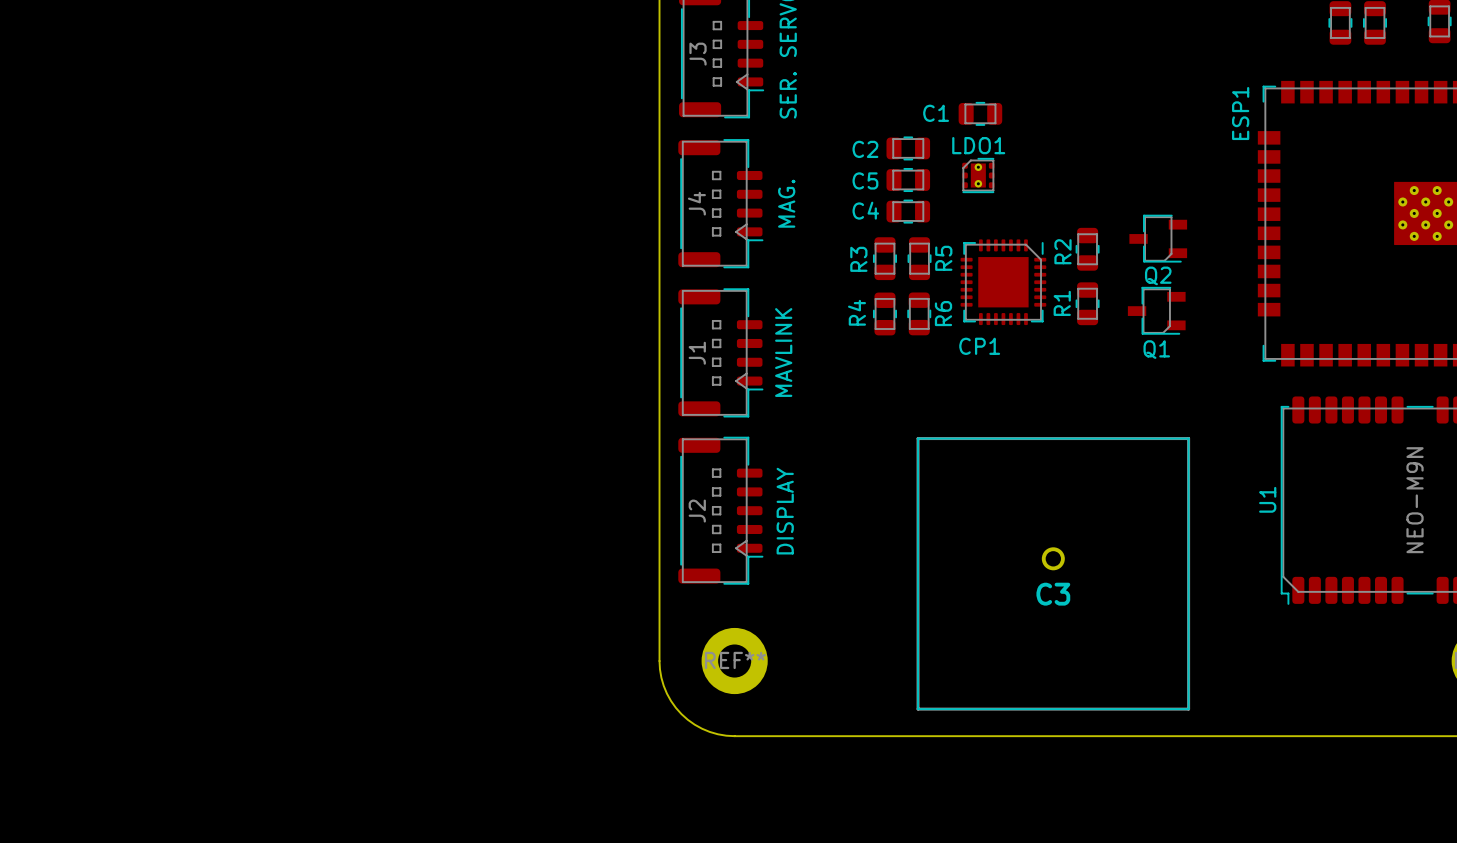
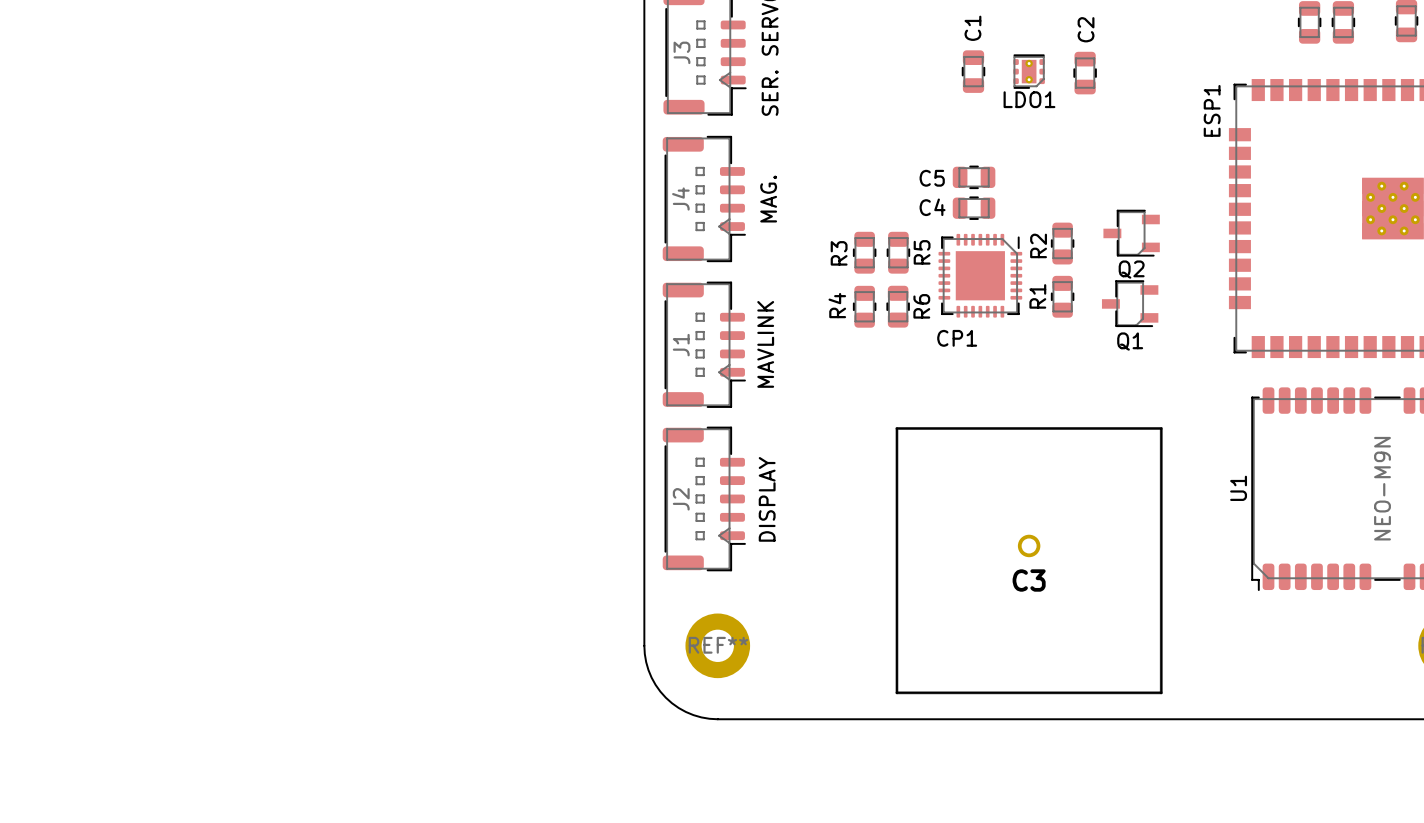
C1 rotation: 0° (980, 113) -> 90° clockwise (973, 71)
C1 position: (980, 113) -> (973, 71)
C2 rotation: 0° (908, 148) -> 90° clockwise (1085, 73)
C2 position: (908, 148) -> (1085, 73)
LDO1 rotation: 0° (978, 175) -> 180° (1029, 71)
LDO1 position: (978, 175) -> (1029, 71)
C5 position: (908, 180) -> (974, 177)
C4 position: (908, 211) -> (974, 208)

